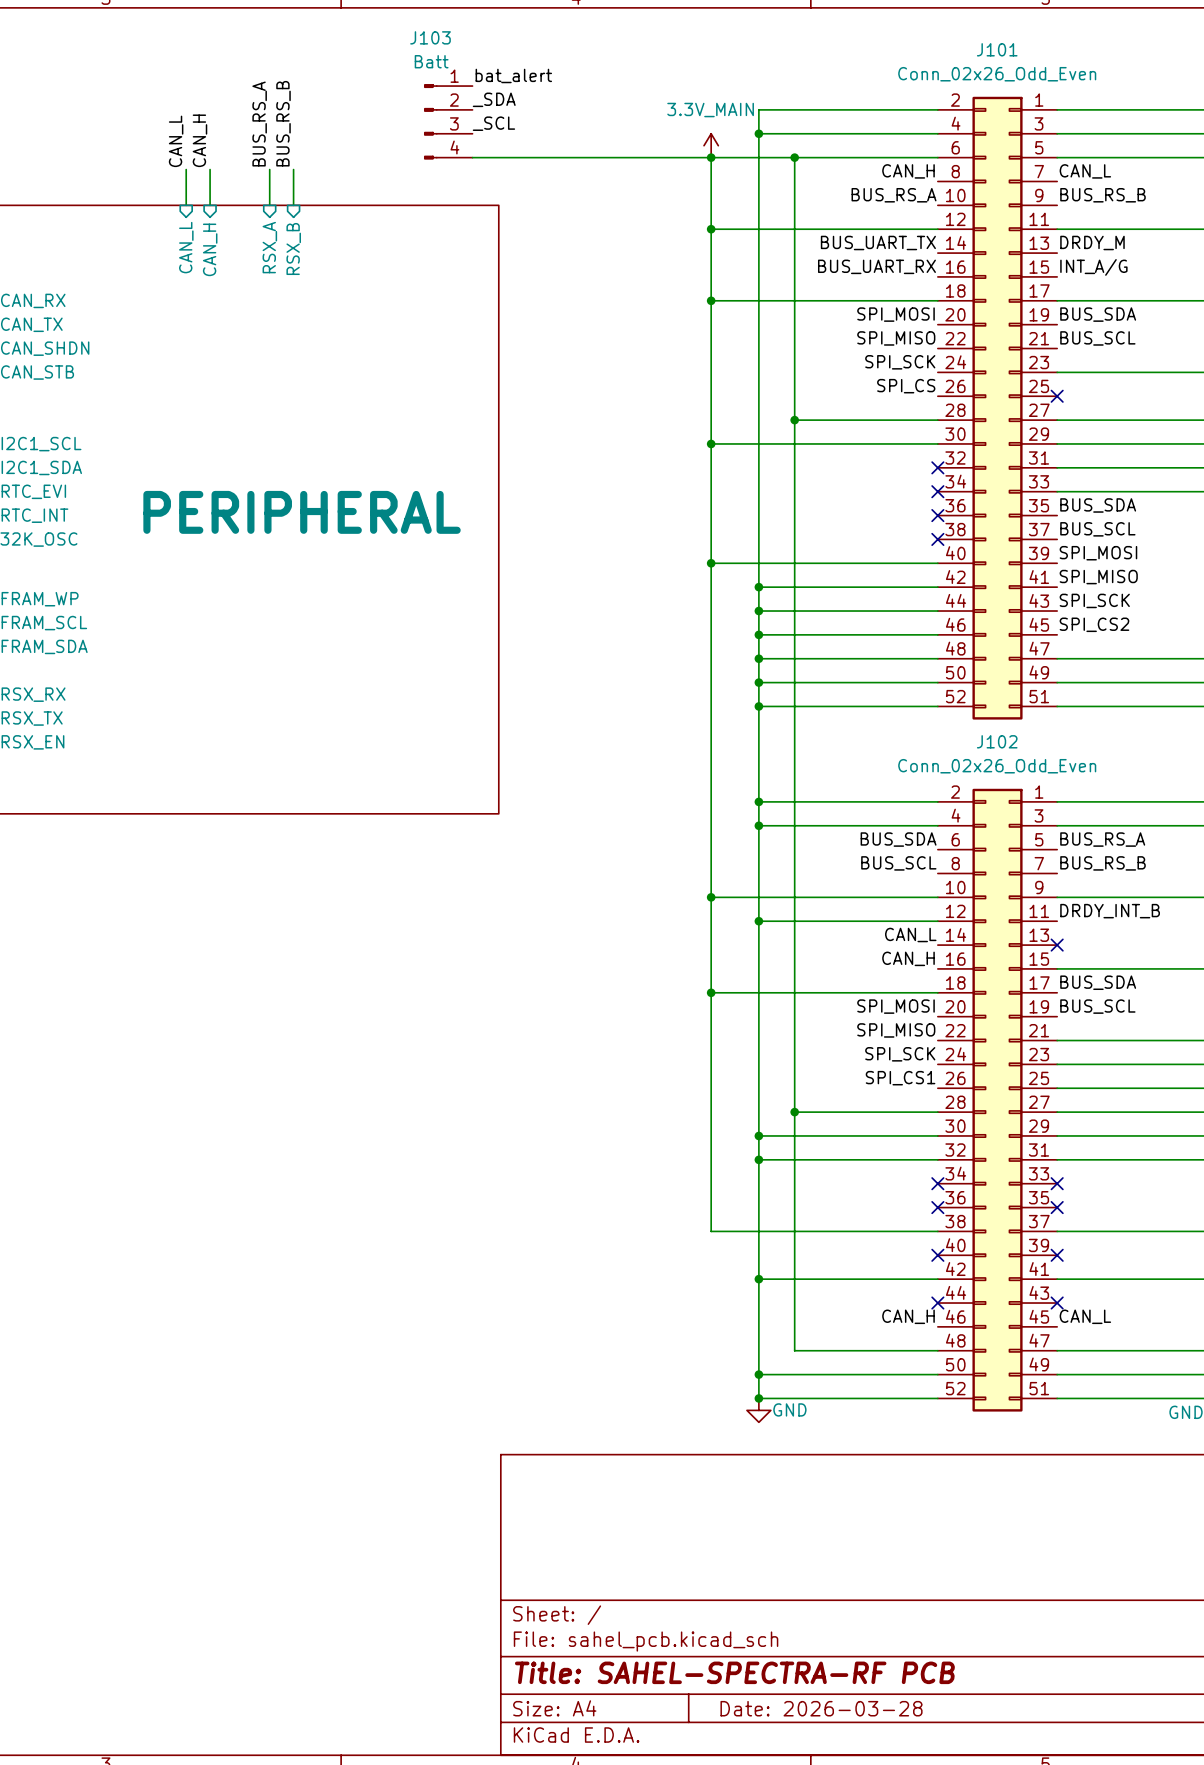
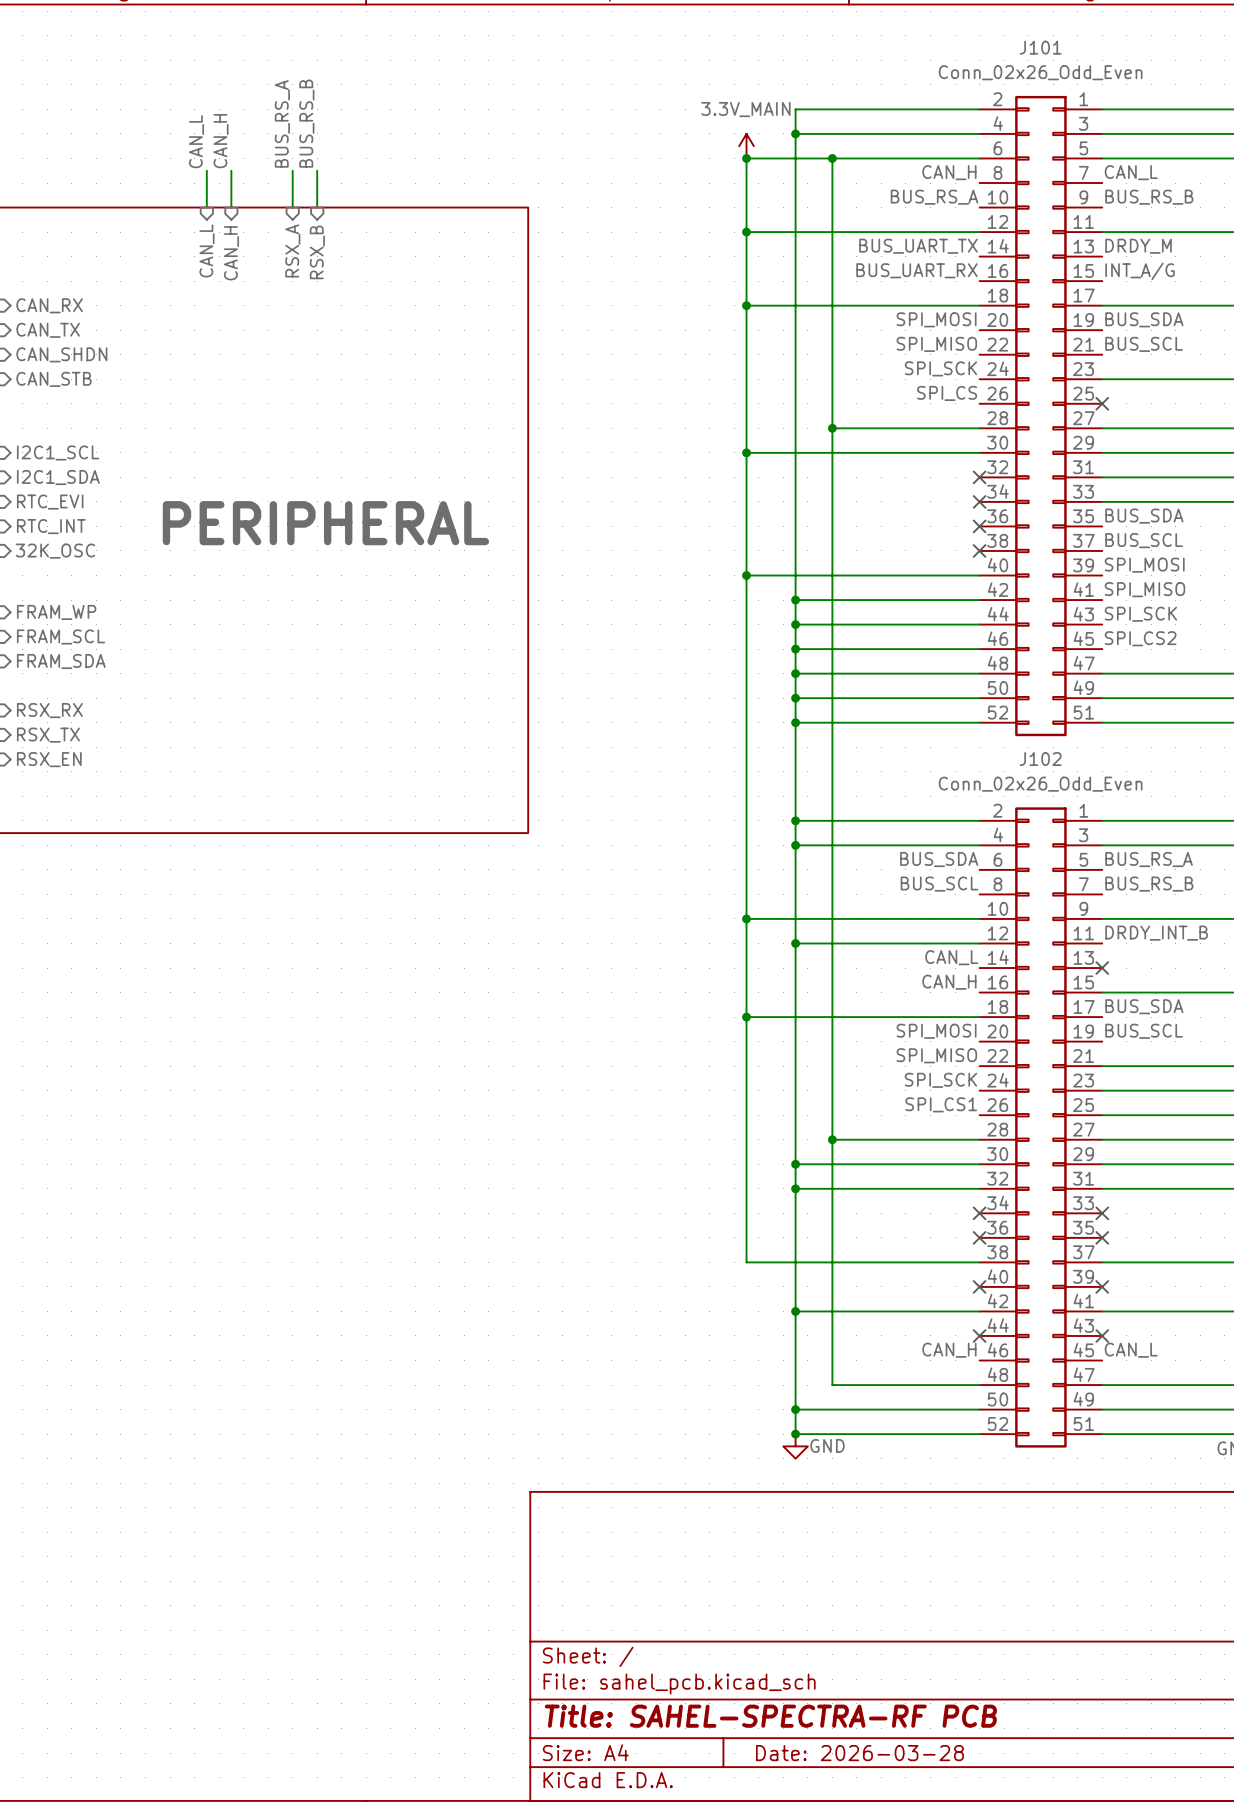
label: bat_alert (513, 75) -> none
label: _SDA (494, 99) -> none
J103: Batt (448, 121) -> none
label: _SCL (493, 123) -> none
wire: (472, 157) (711, 157) -> none

